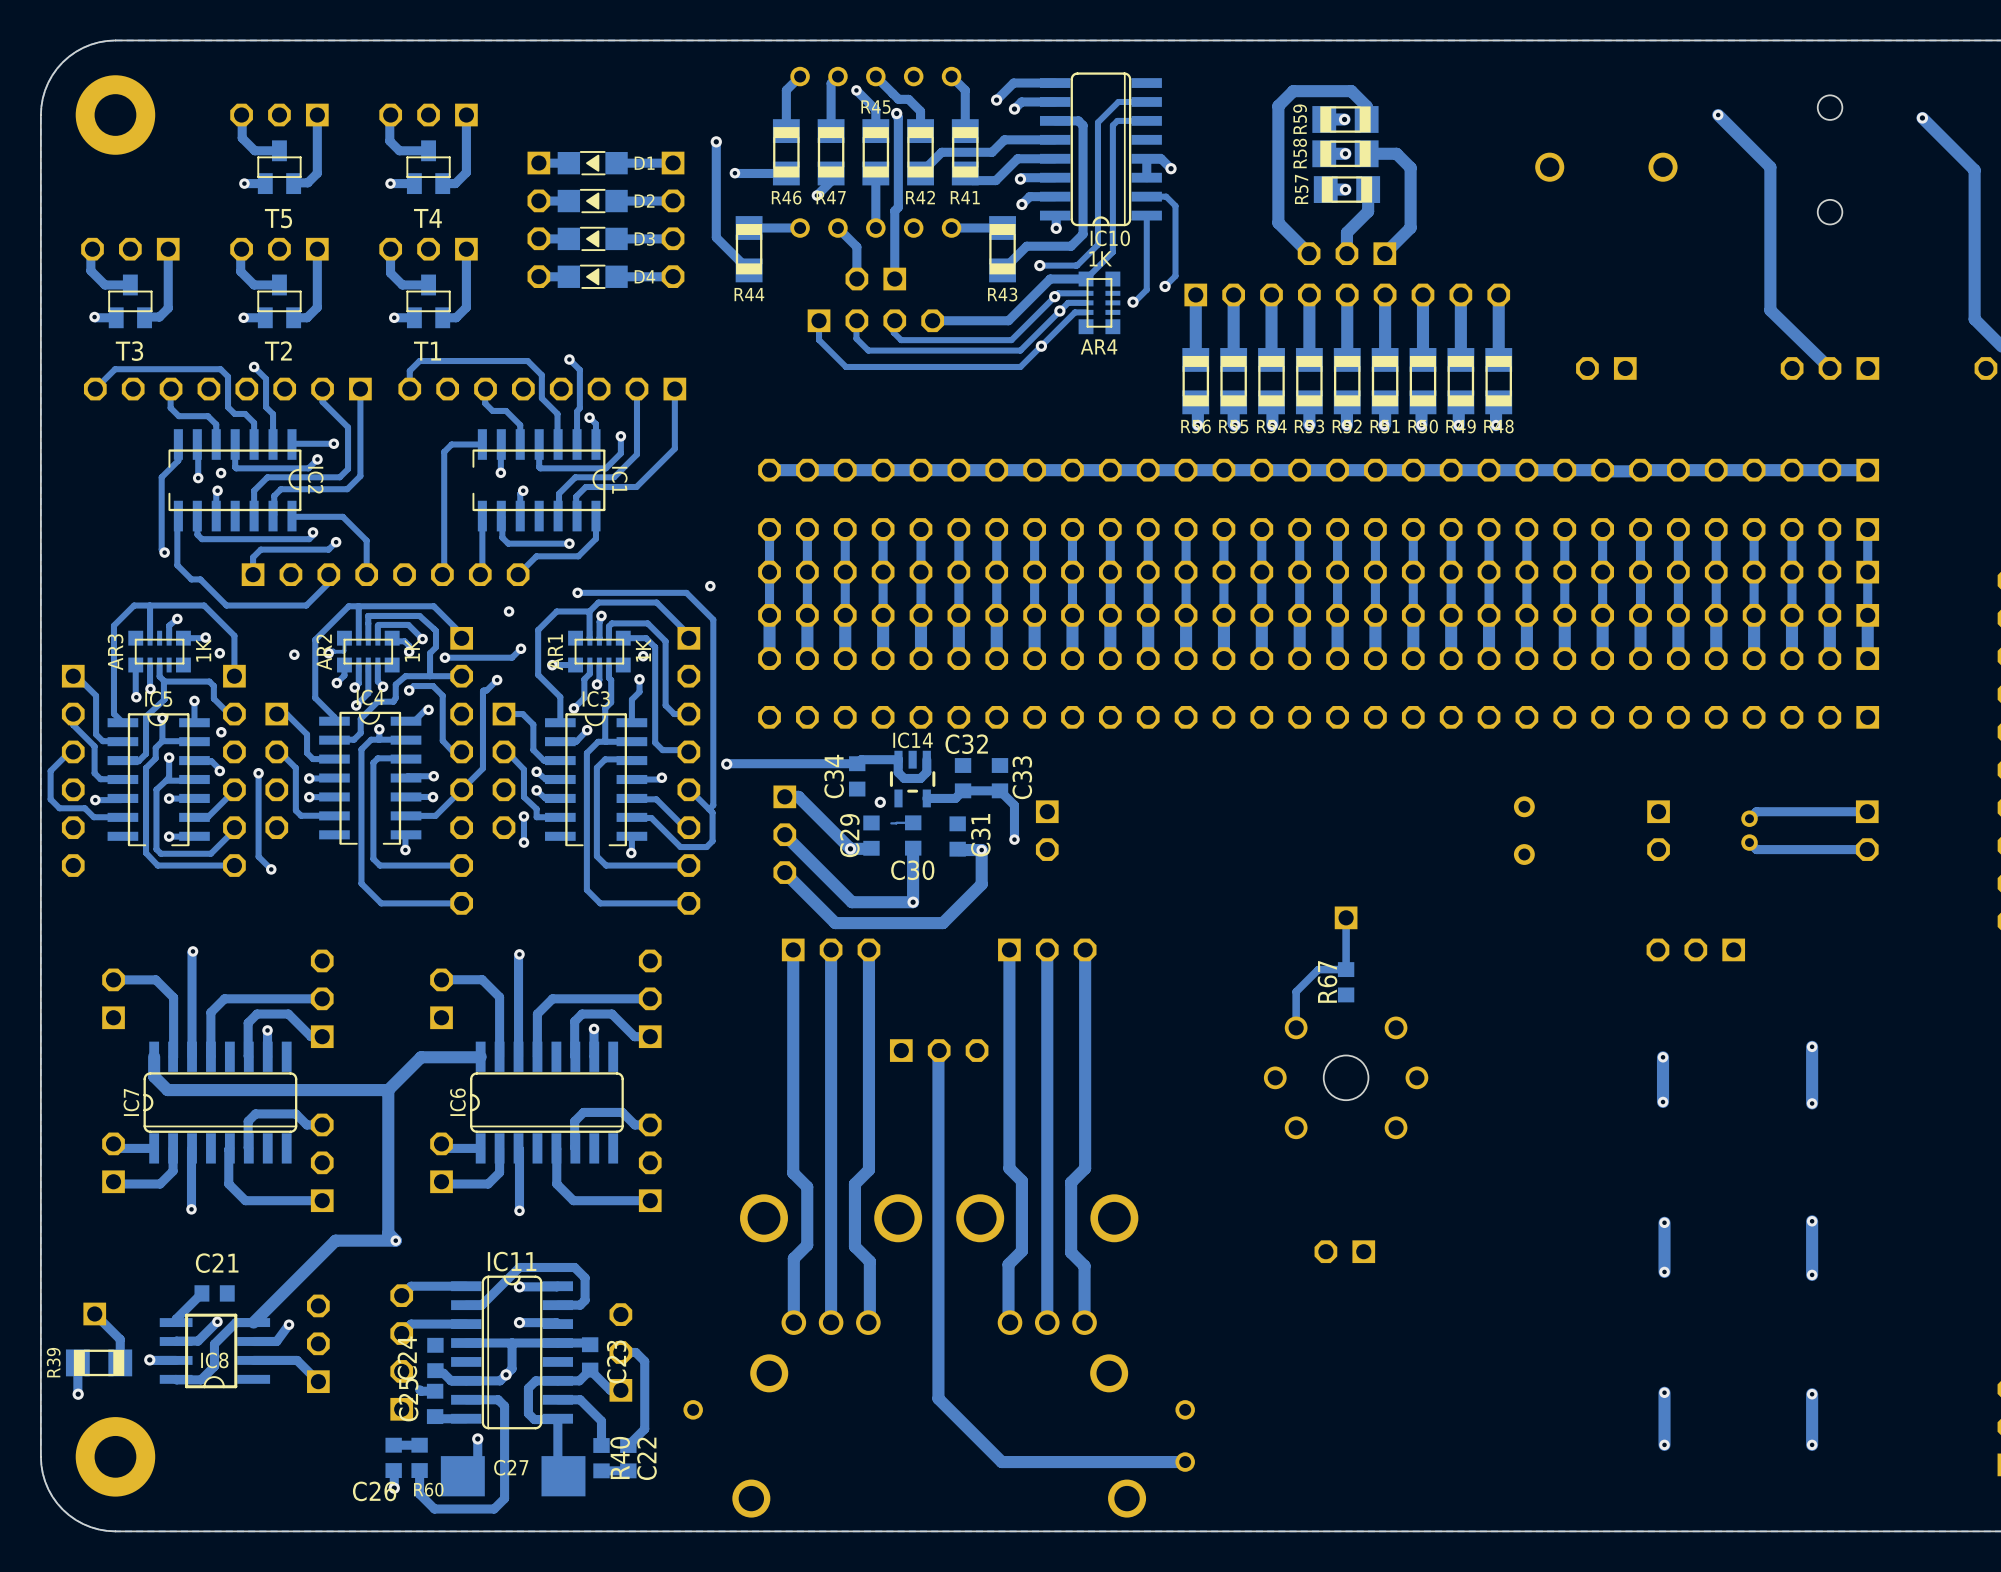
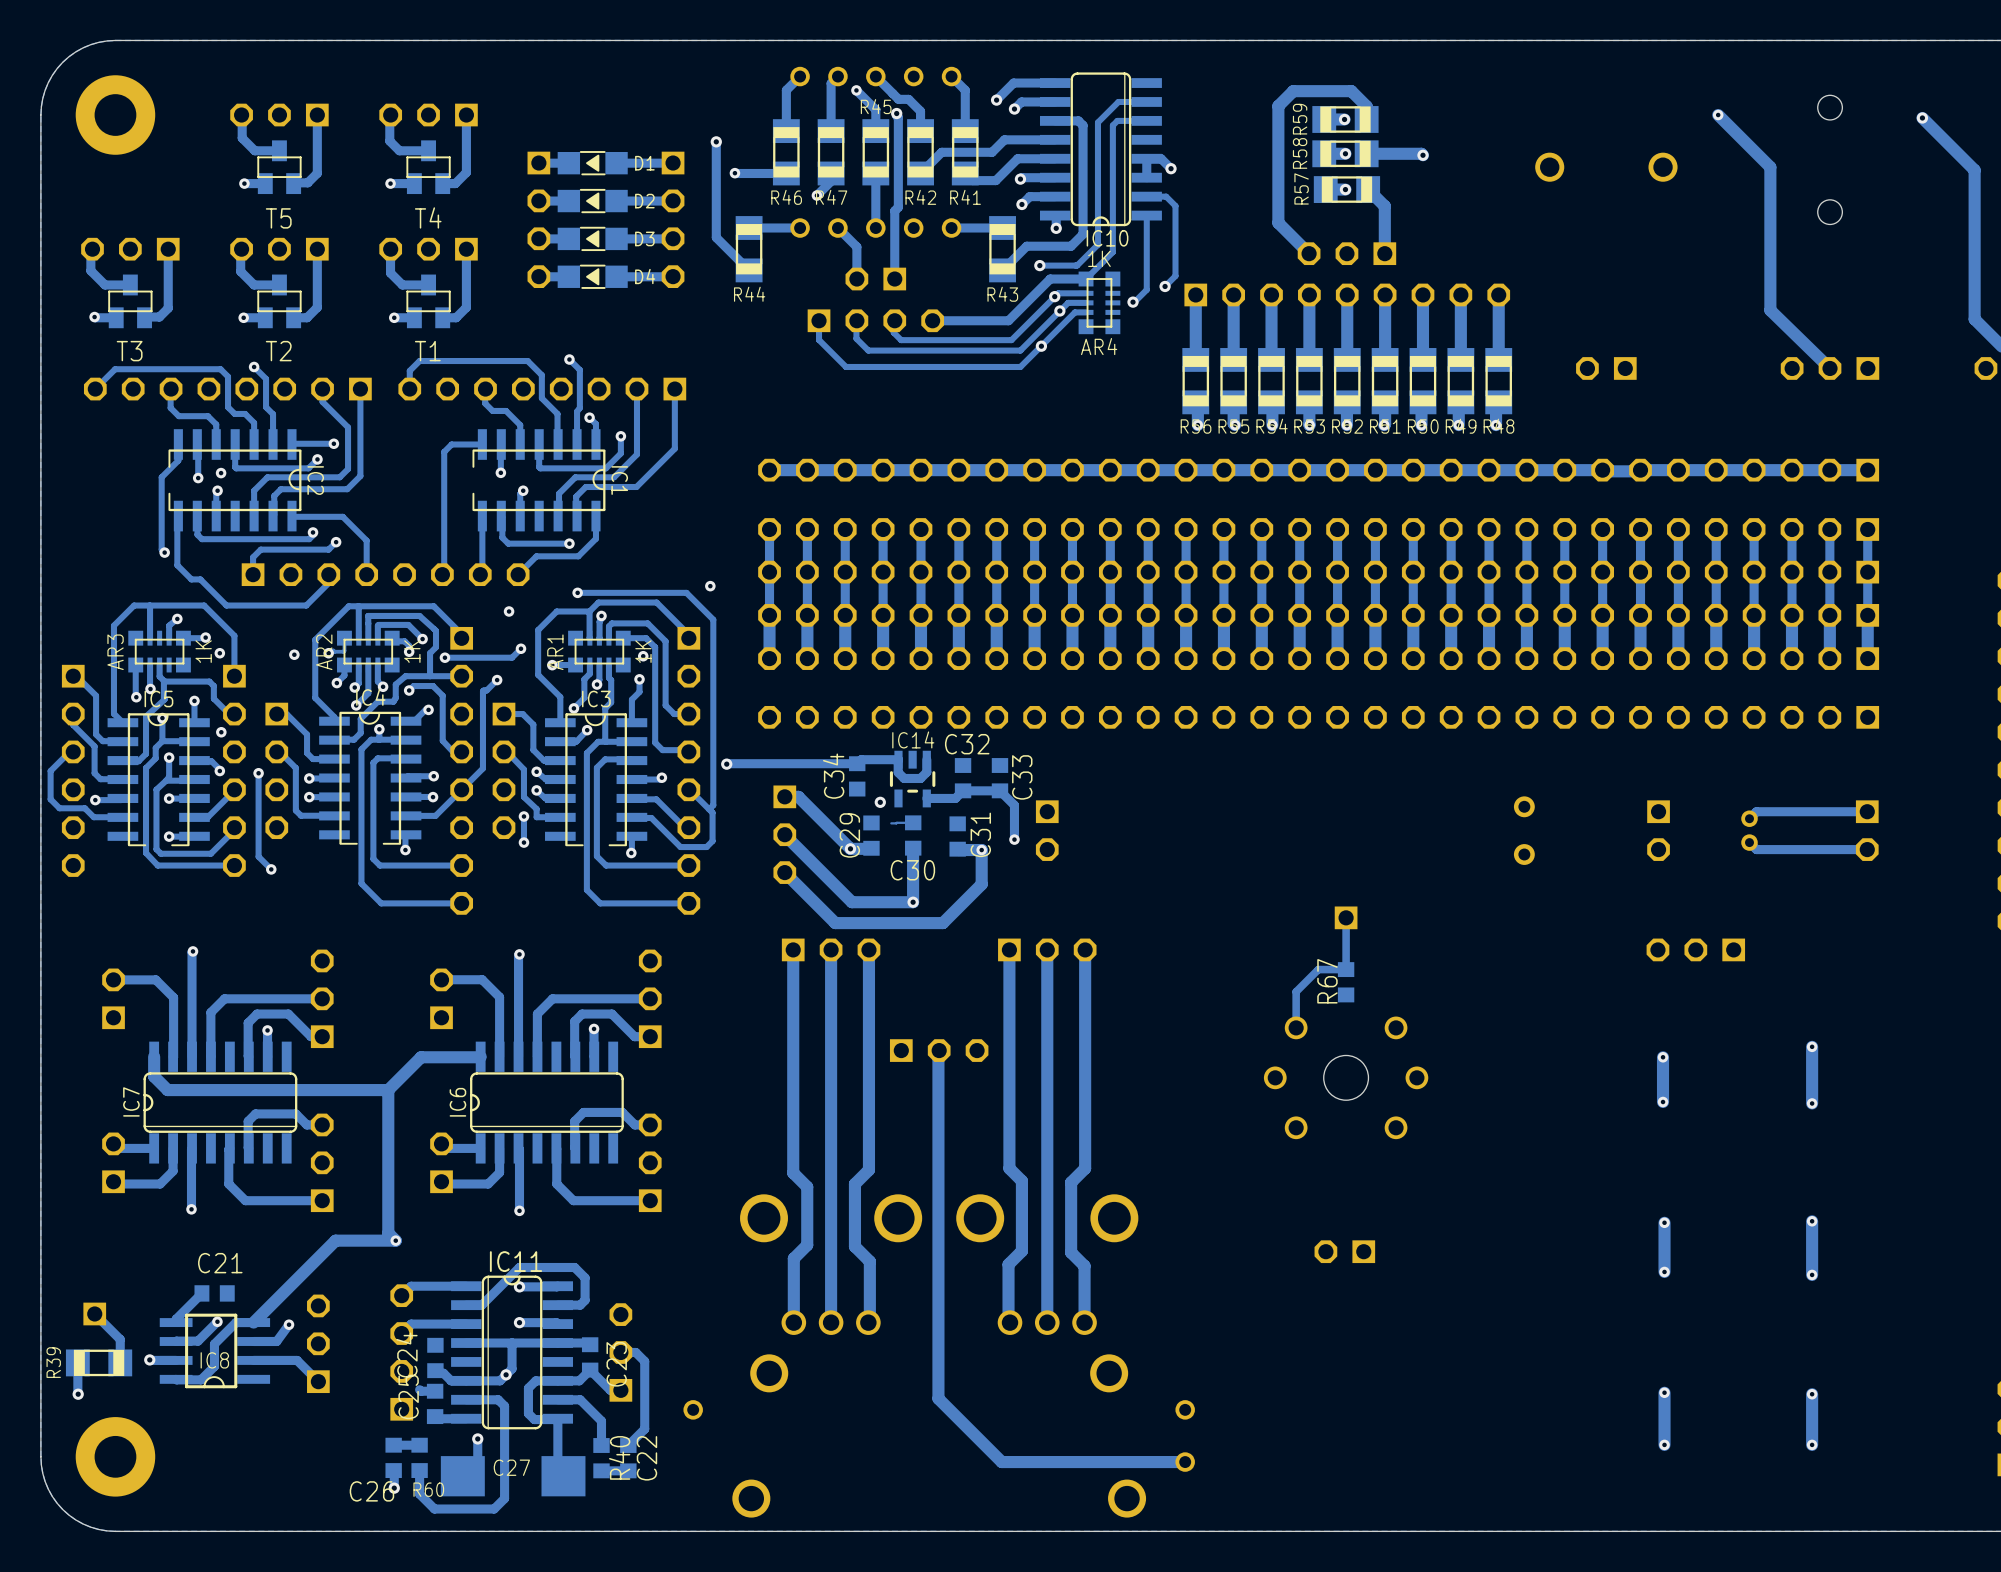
track: (1396, 153) (1410, 167) (1410, 227) (1384, 253) -> (1396, 153) (1422, 155)
via: none -> (1422, 155)
track: (1368, 189) (1368, 211) (1346, 232) (1346, 253) -> (1368, 189) (1384, 206) (1384, 253)

